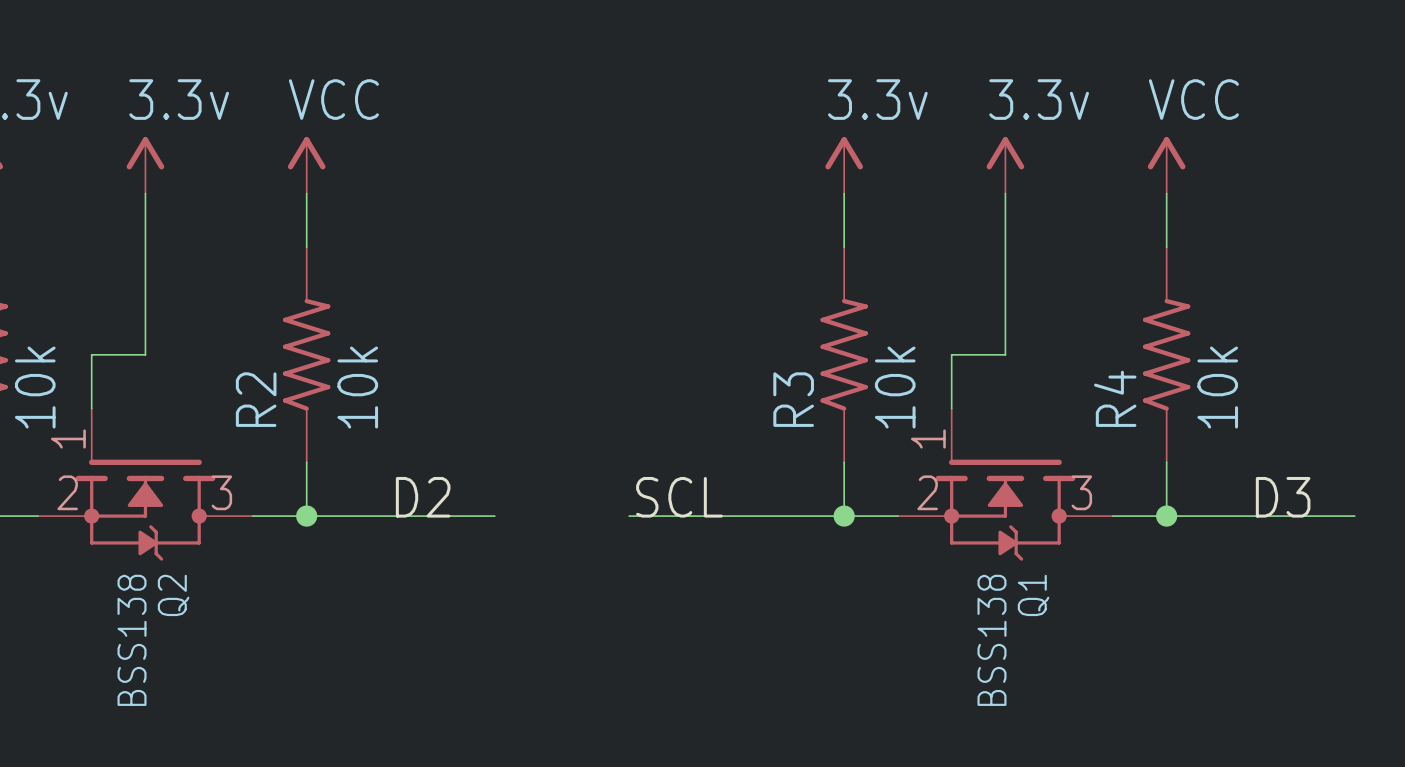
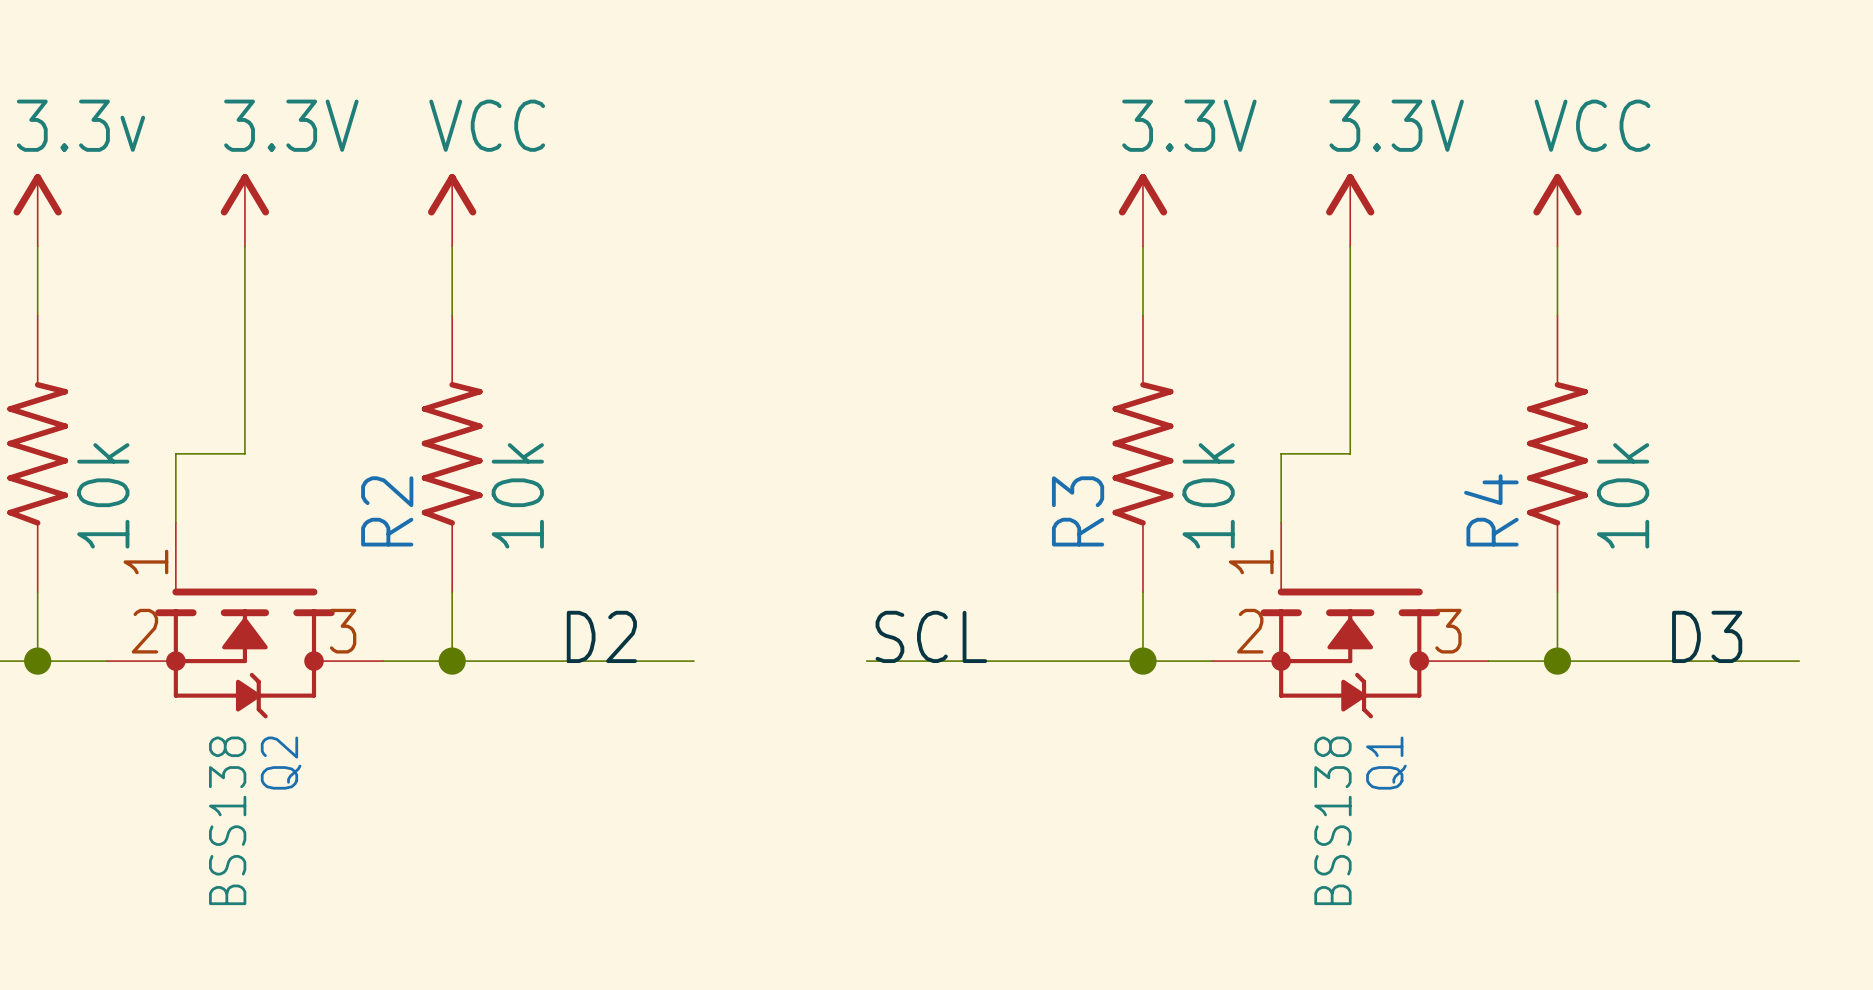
power symbol: 3.3v (145, 165) -> 3.3V (244, 210)
power symbol: 3.3v (844, 165) -> 3.3V (1142, 210)
power symbol: 3.3v (1005, 165) -> 3.3V (1350, 210)

